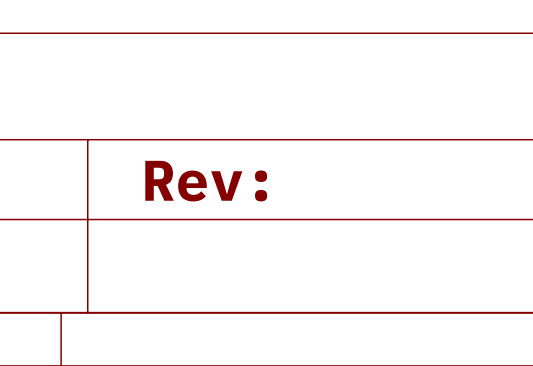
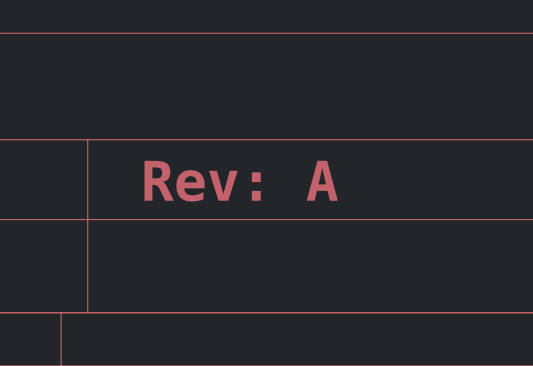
title block: Rev: (206, 181) -> Rev: A (241, 181)

